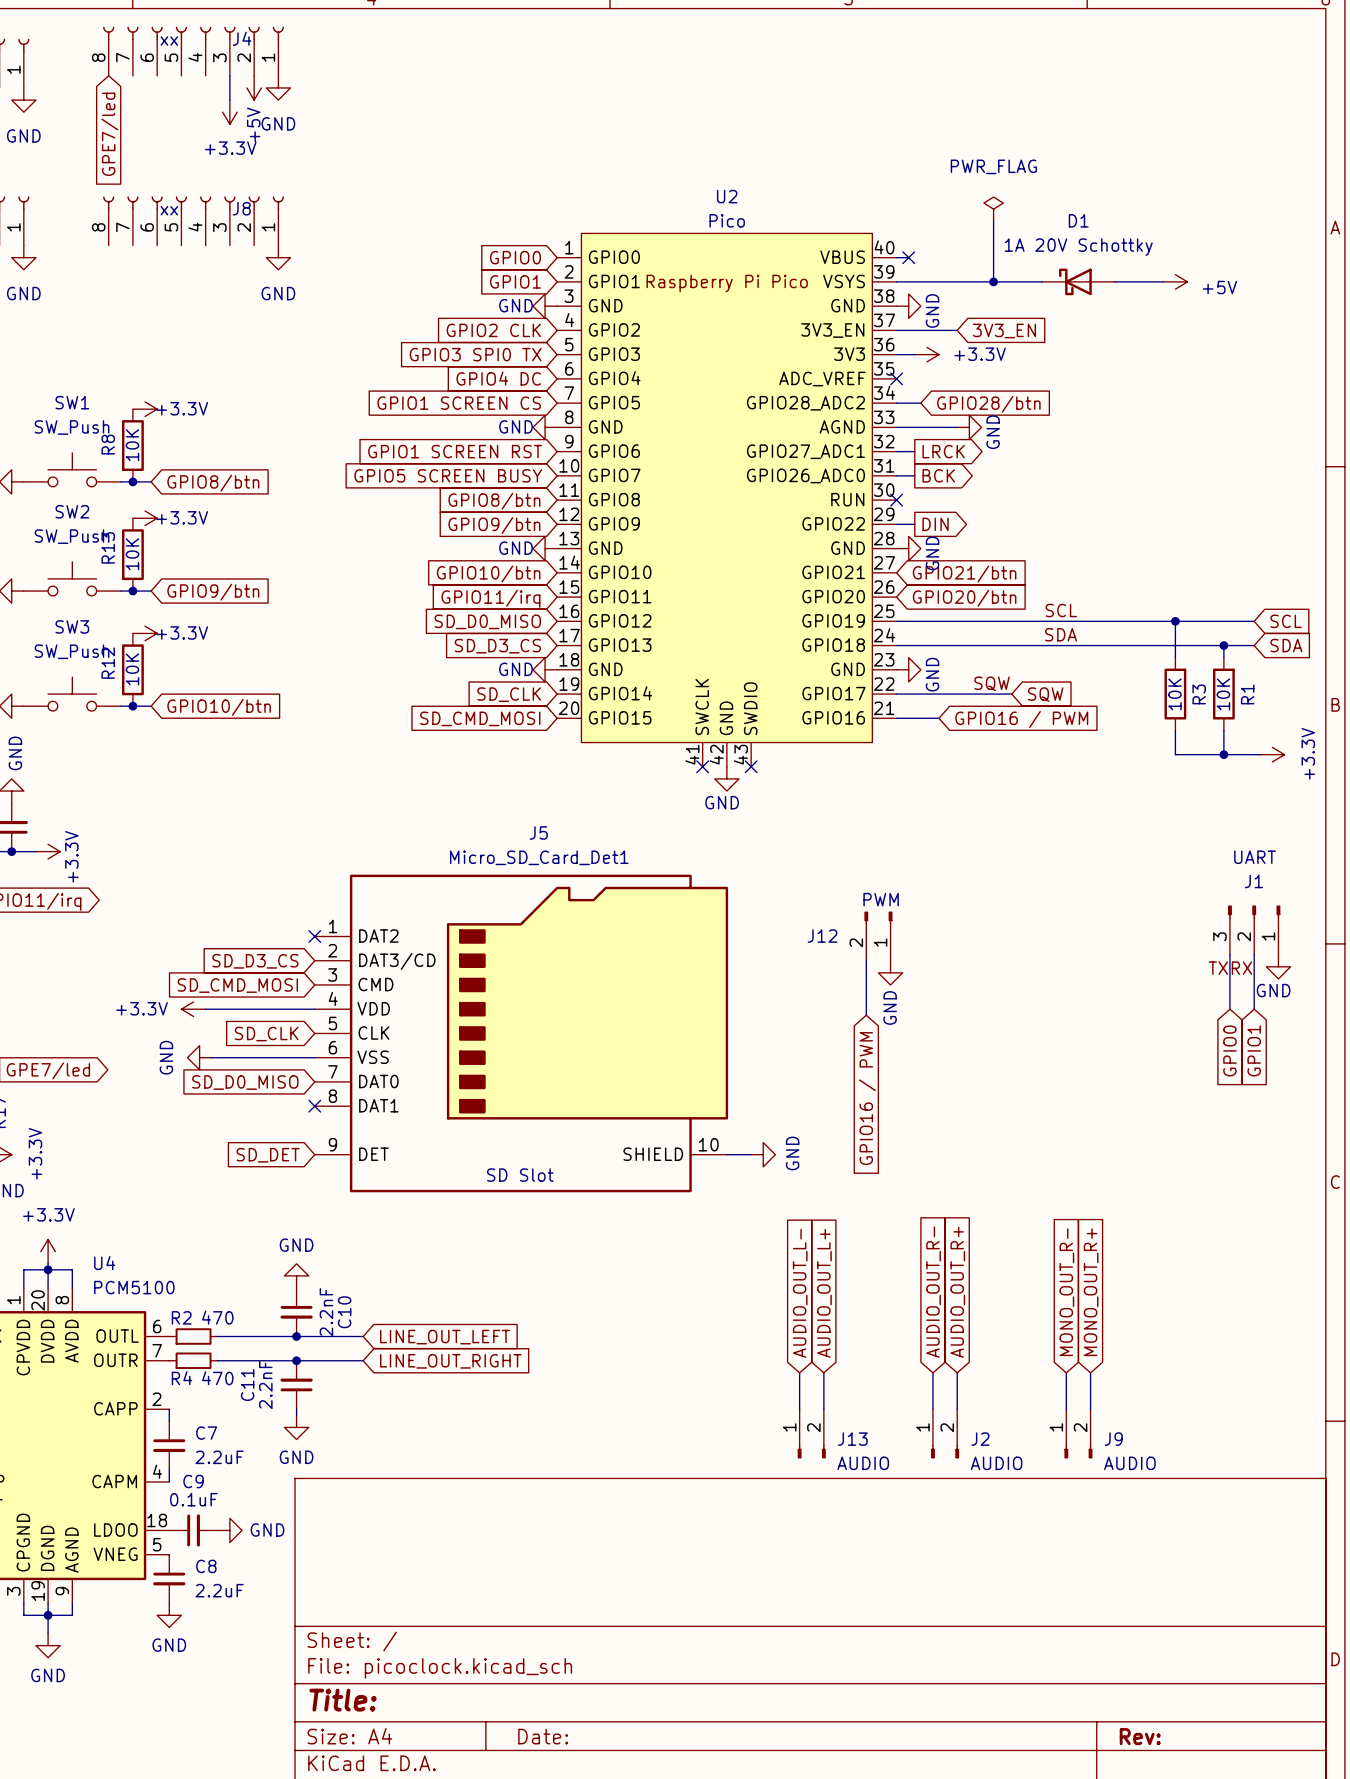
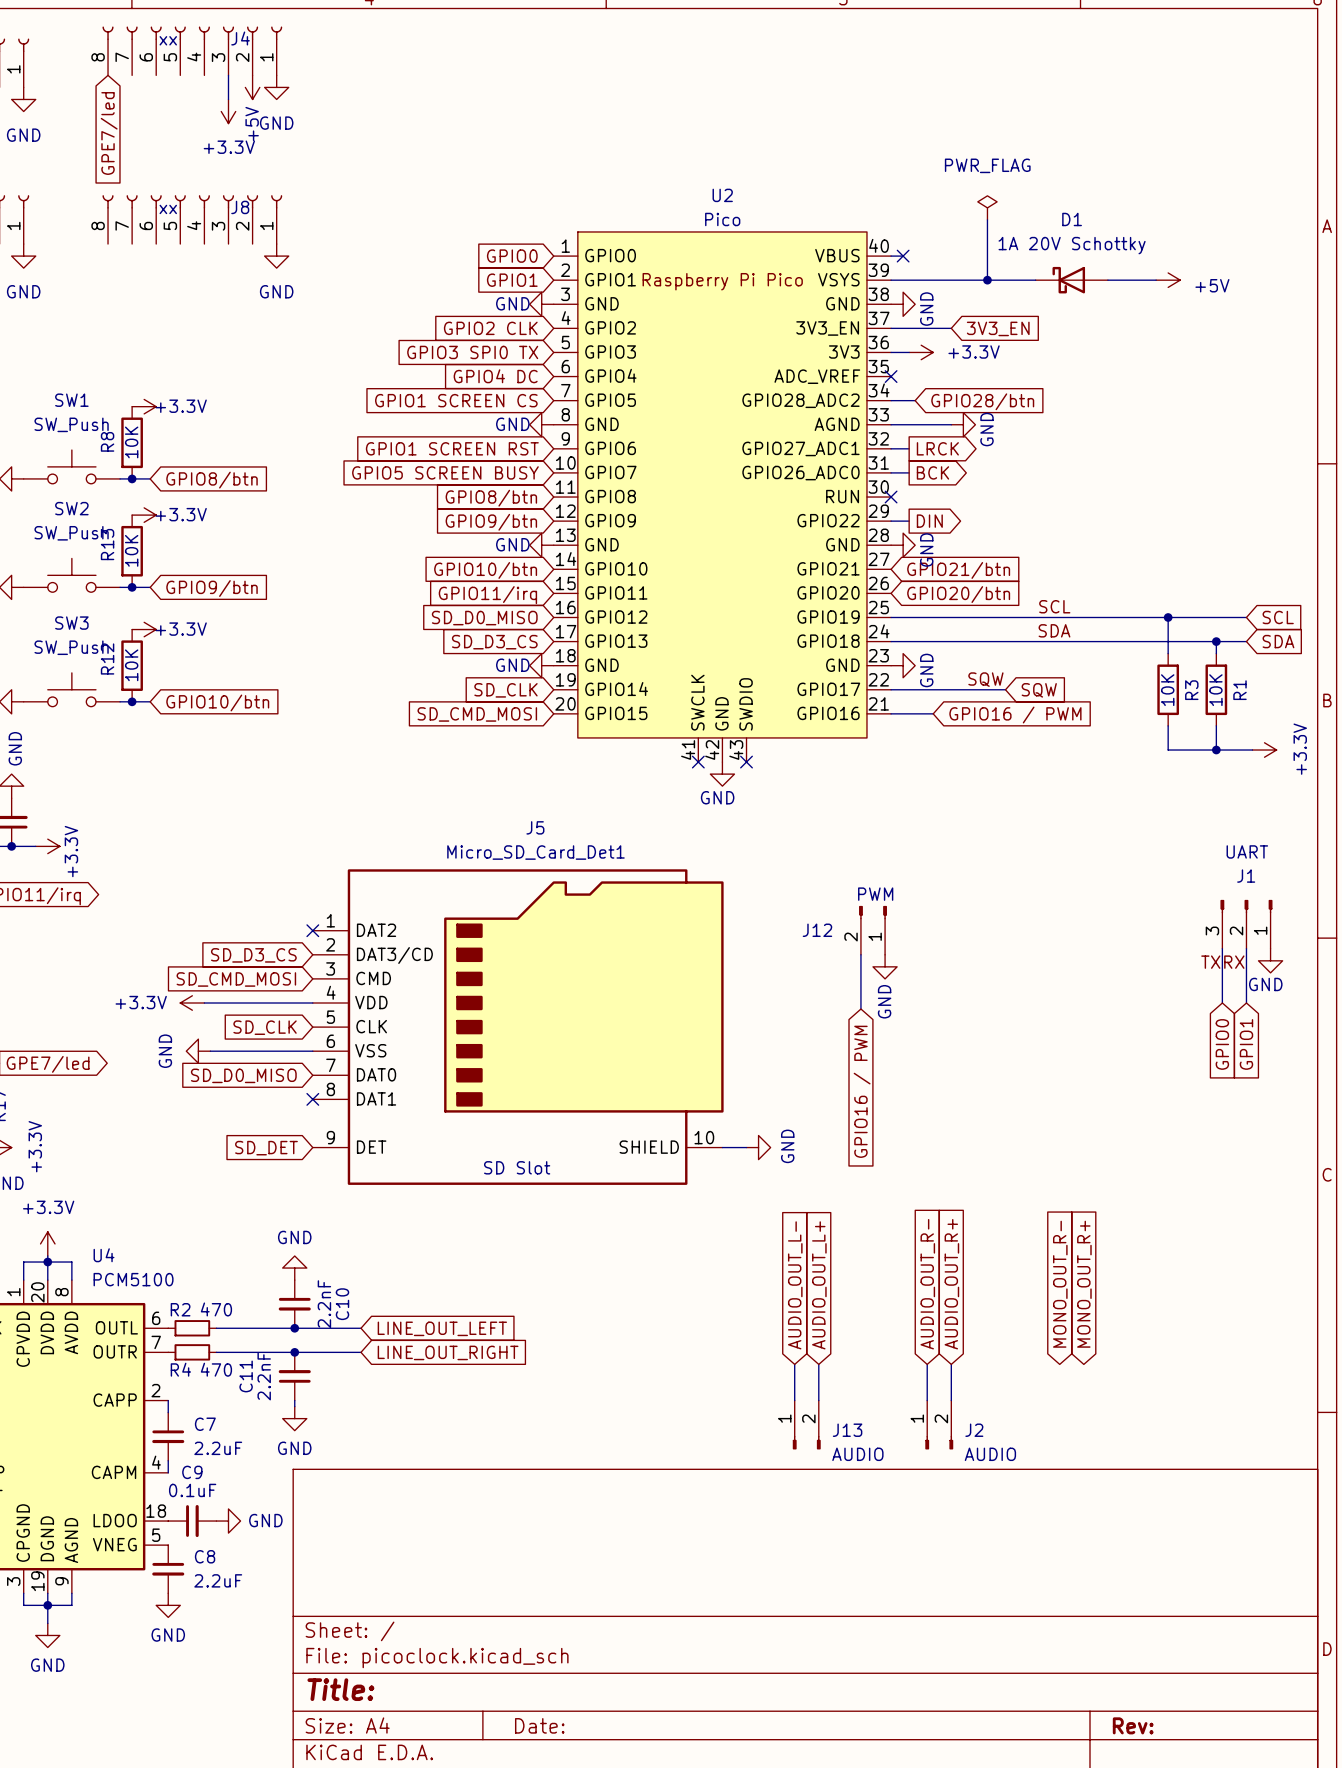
wire: (1066, 1372) (1066, 1409) -> none
wire: (1090, 1372) (1090, 1409) -> none
J9: AUDIO (1078, 1433) -> none

